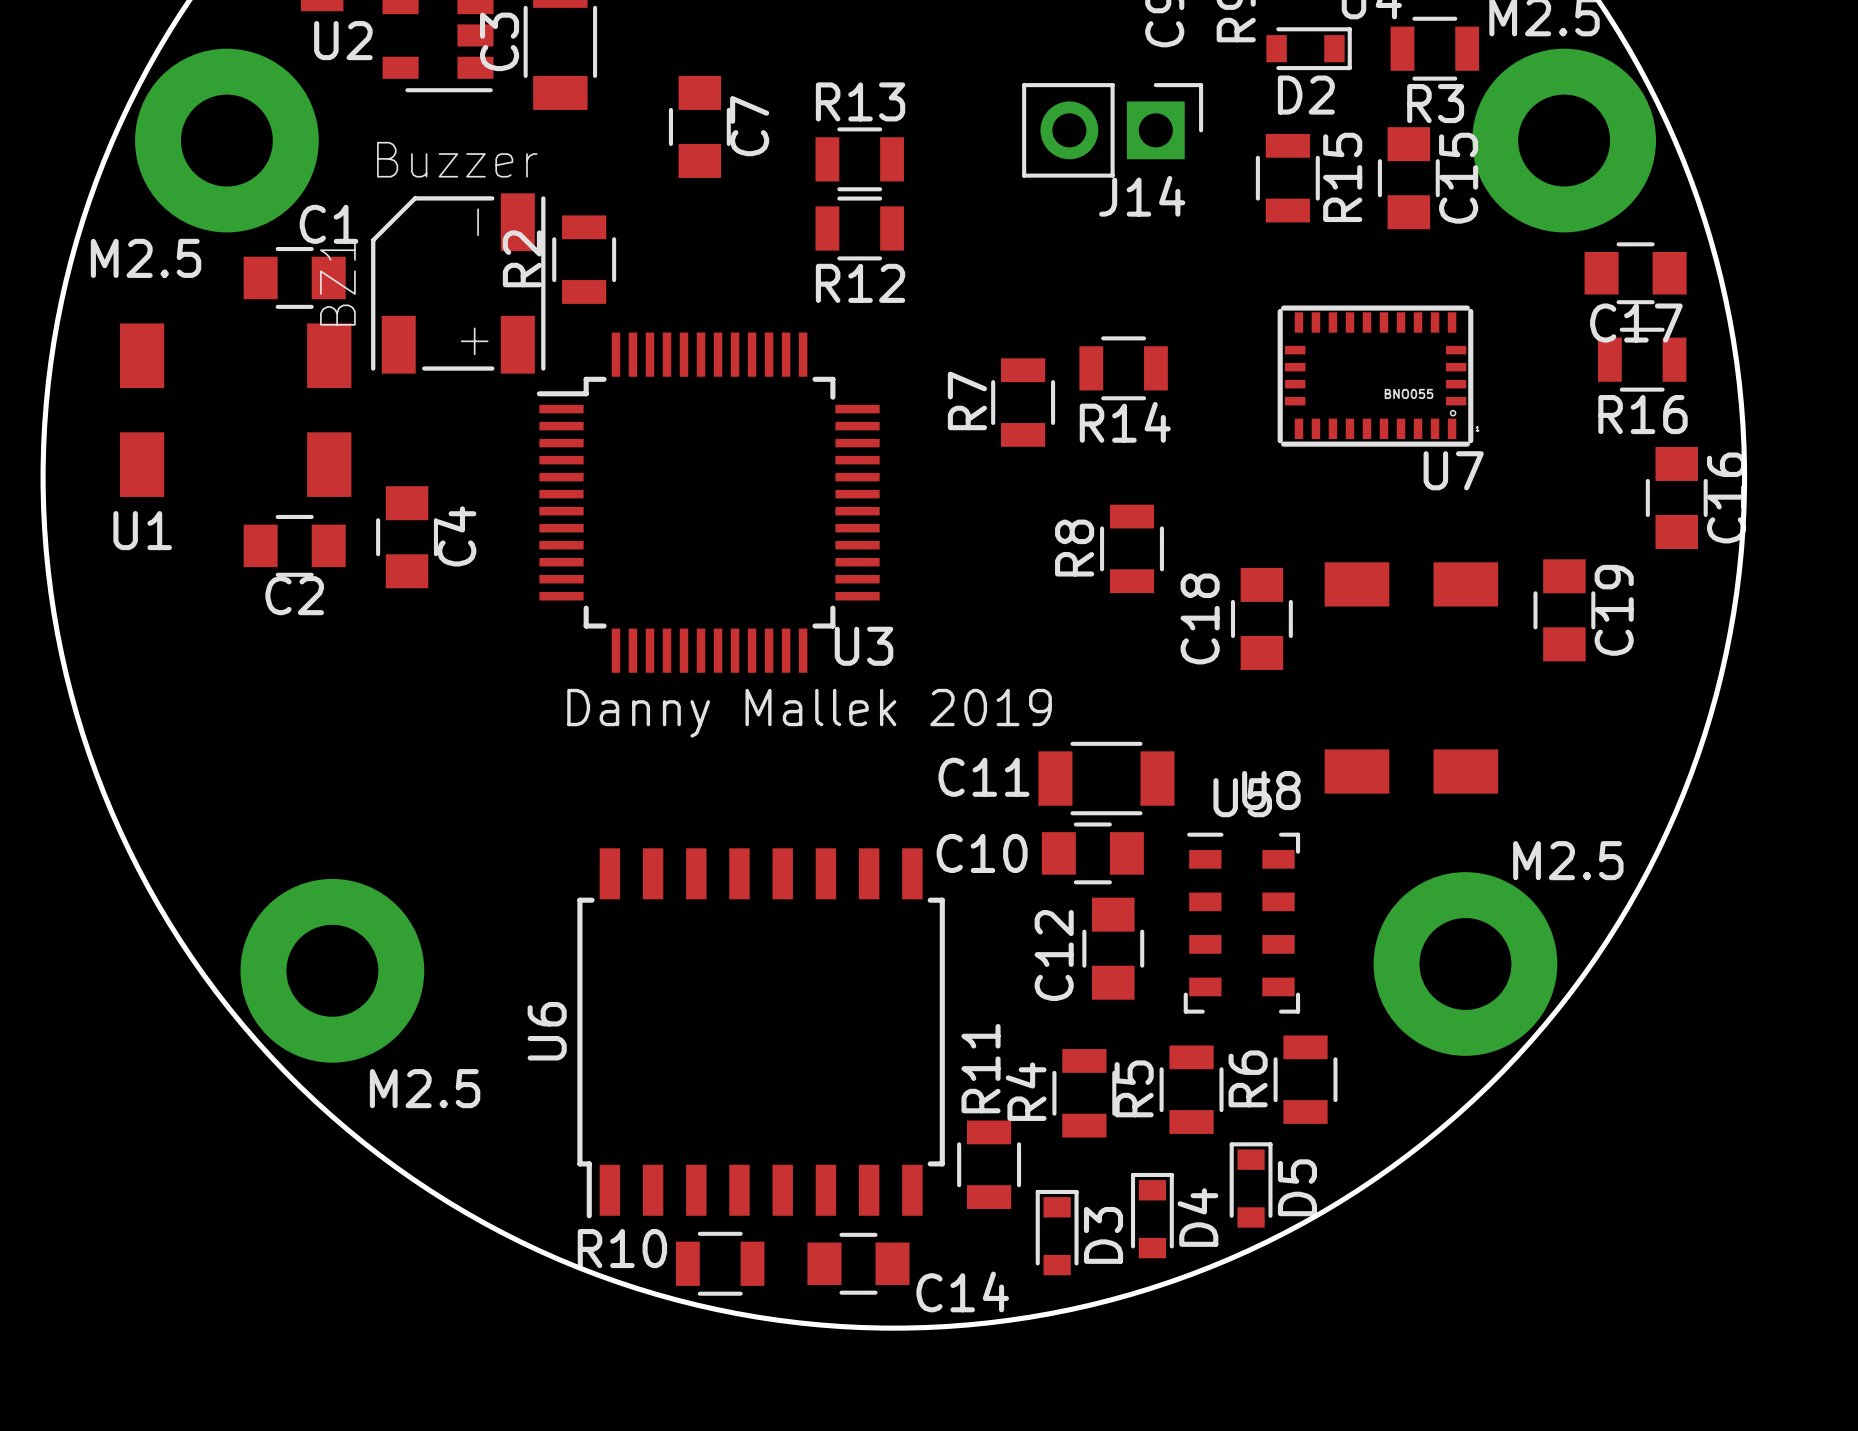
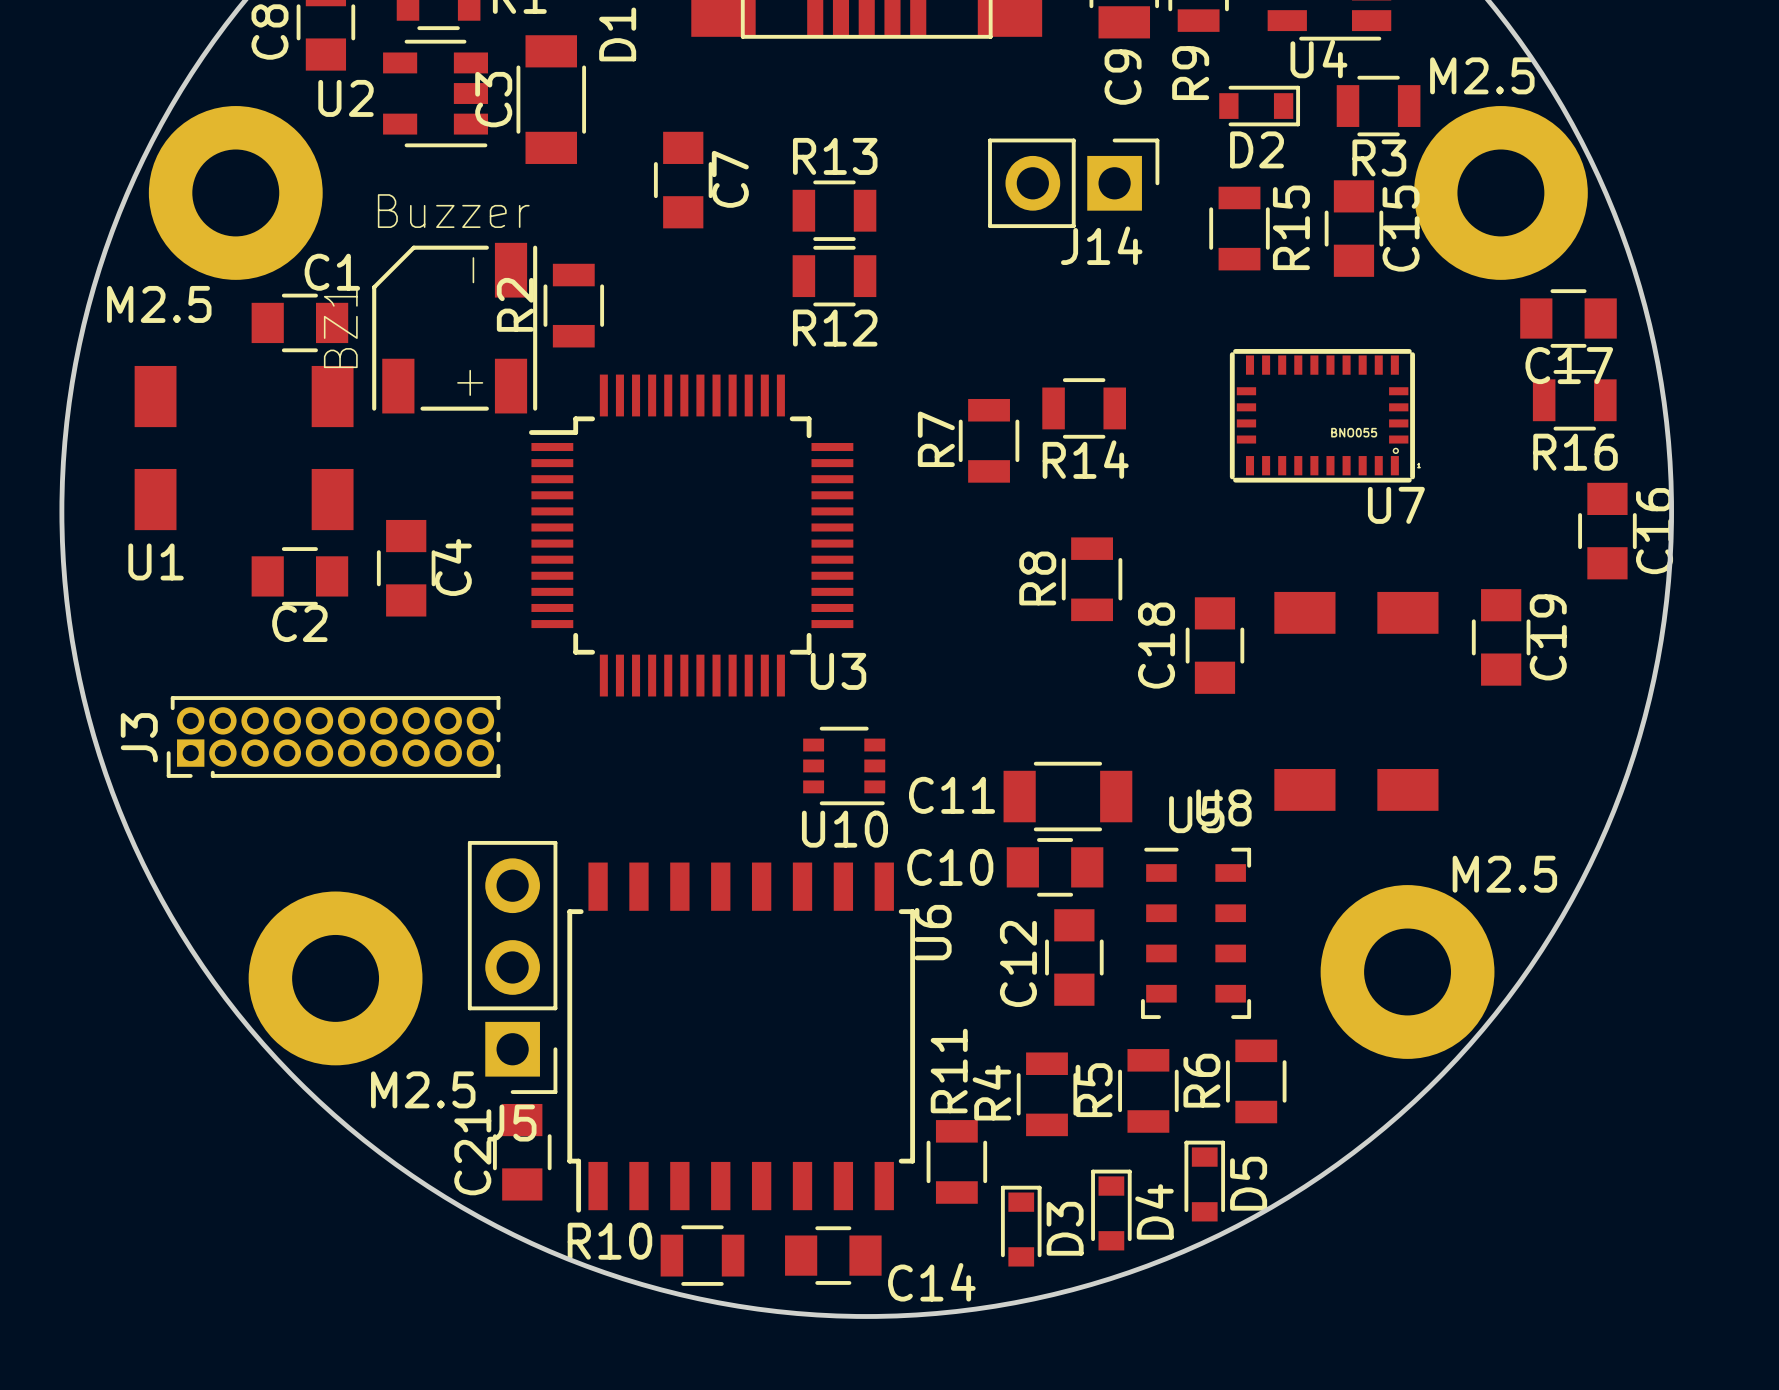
text: Danny Mallek 2019 (809, 713) -> none
J3: none -> (333, 736)
U10: none -> (844, 765)
J5: none -> (512, 967)
U6 name position: U6 (547, 1031) -> U6 (933, 932)
C21: none -> (522, 1152)

